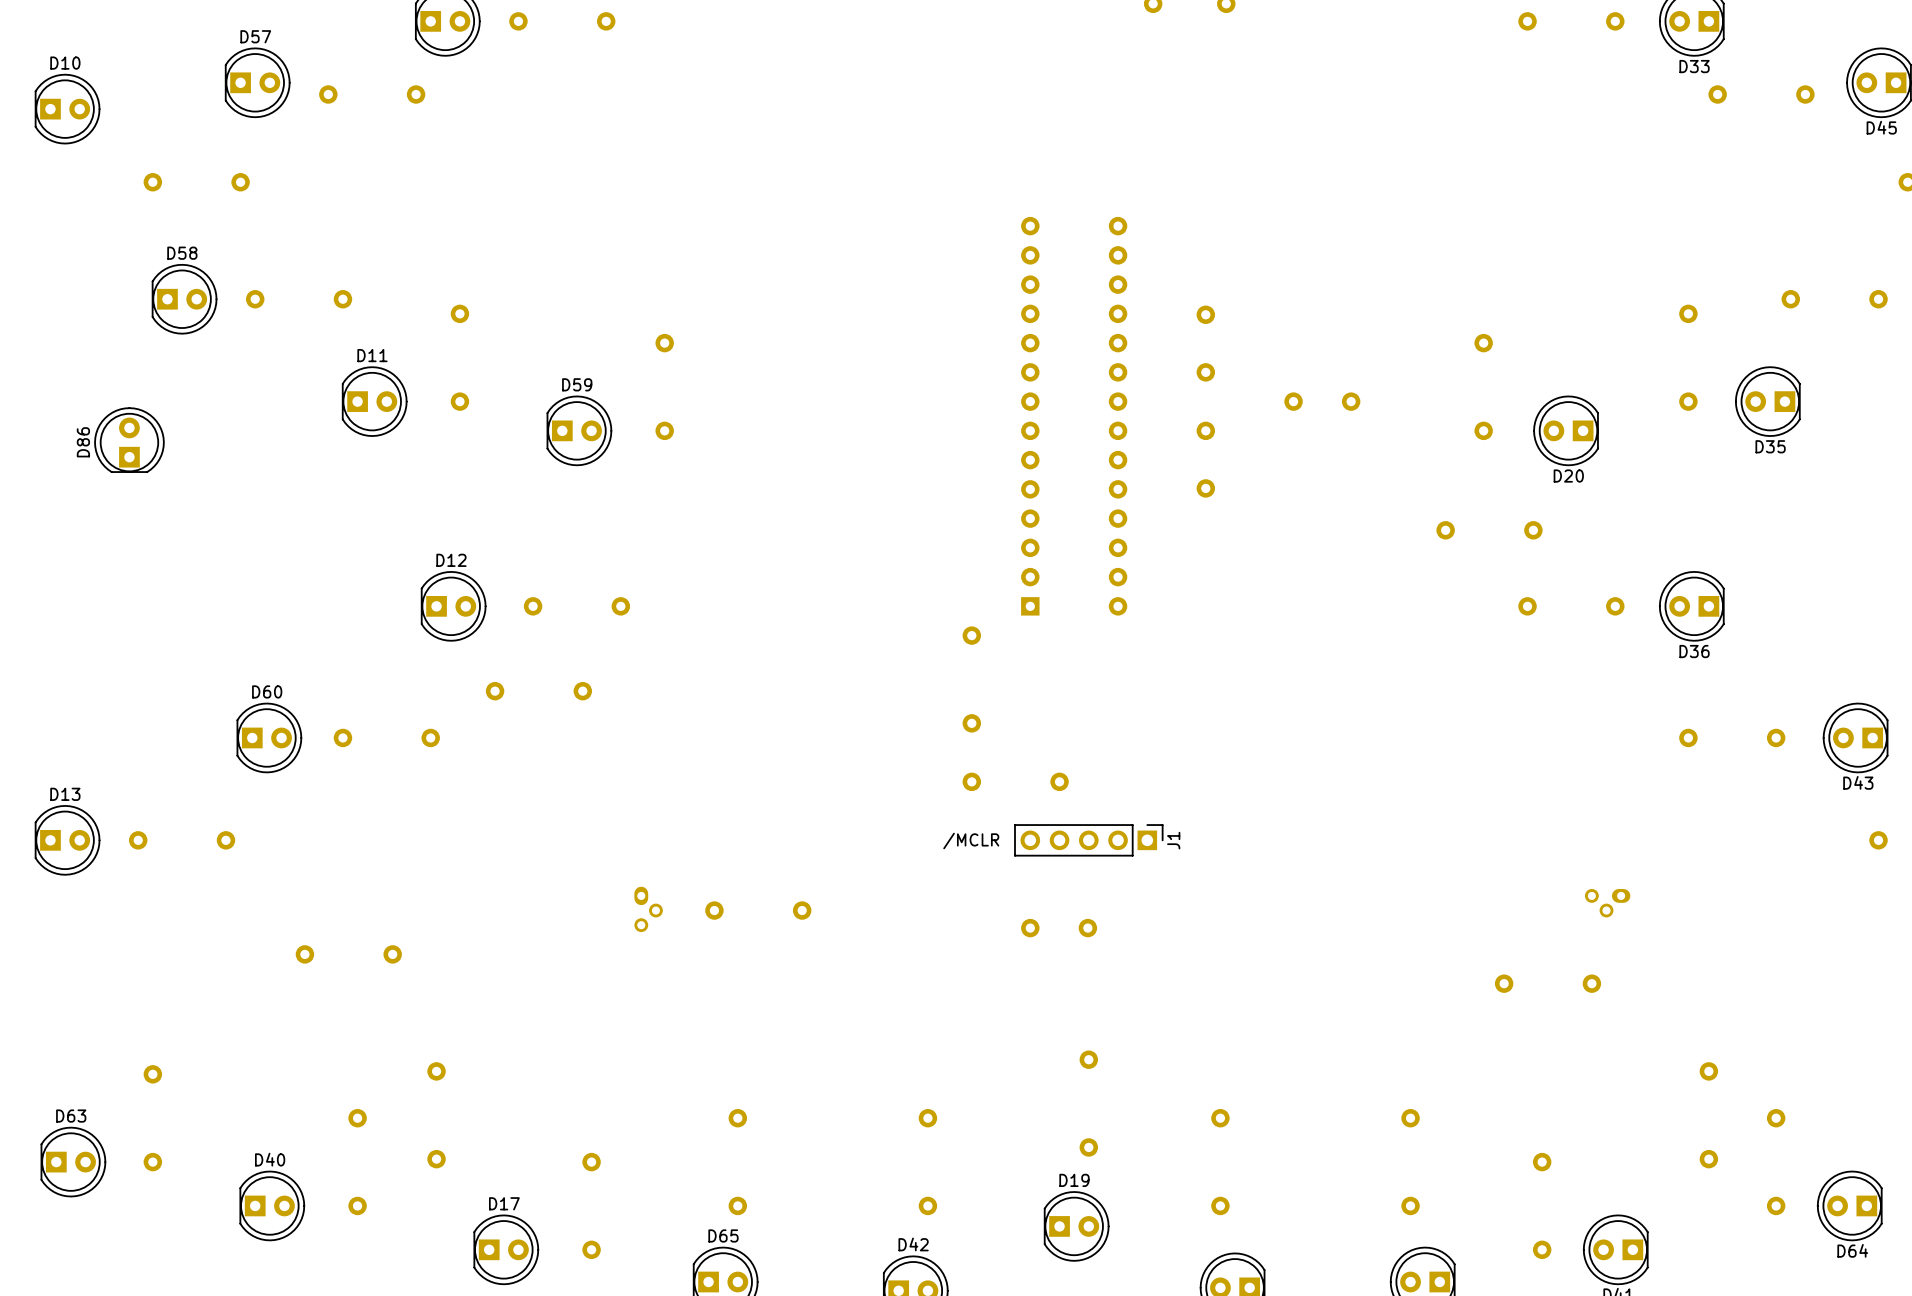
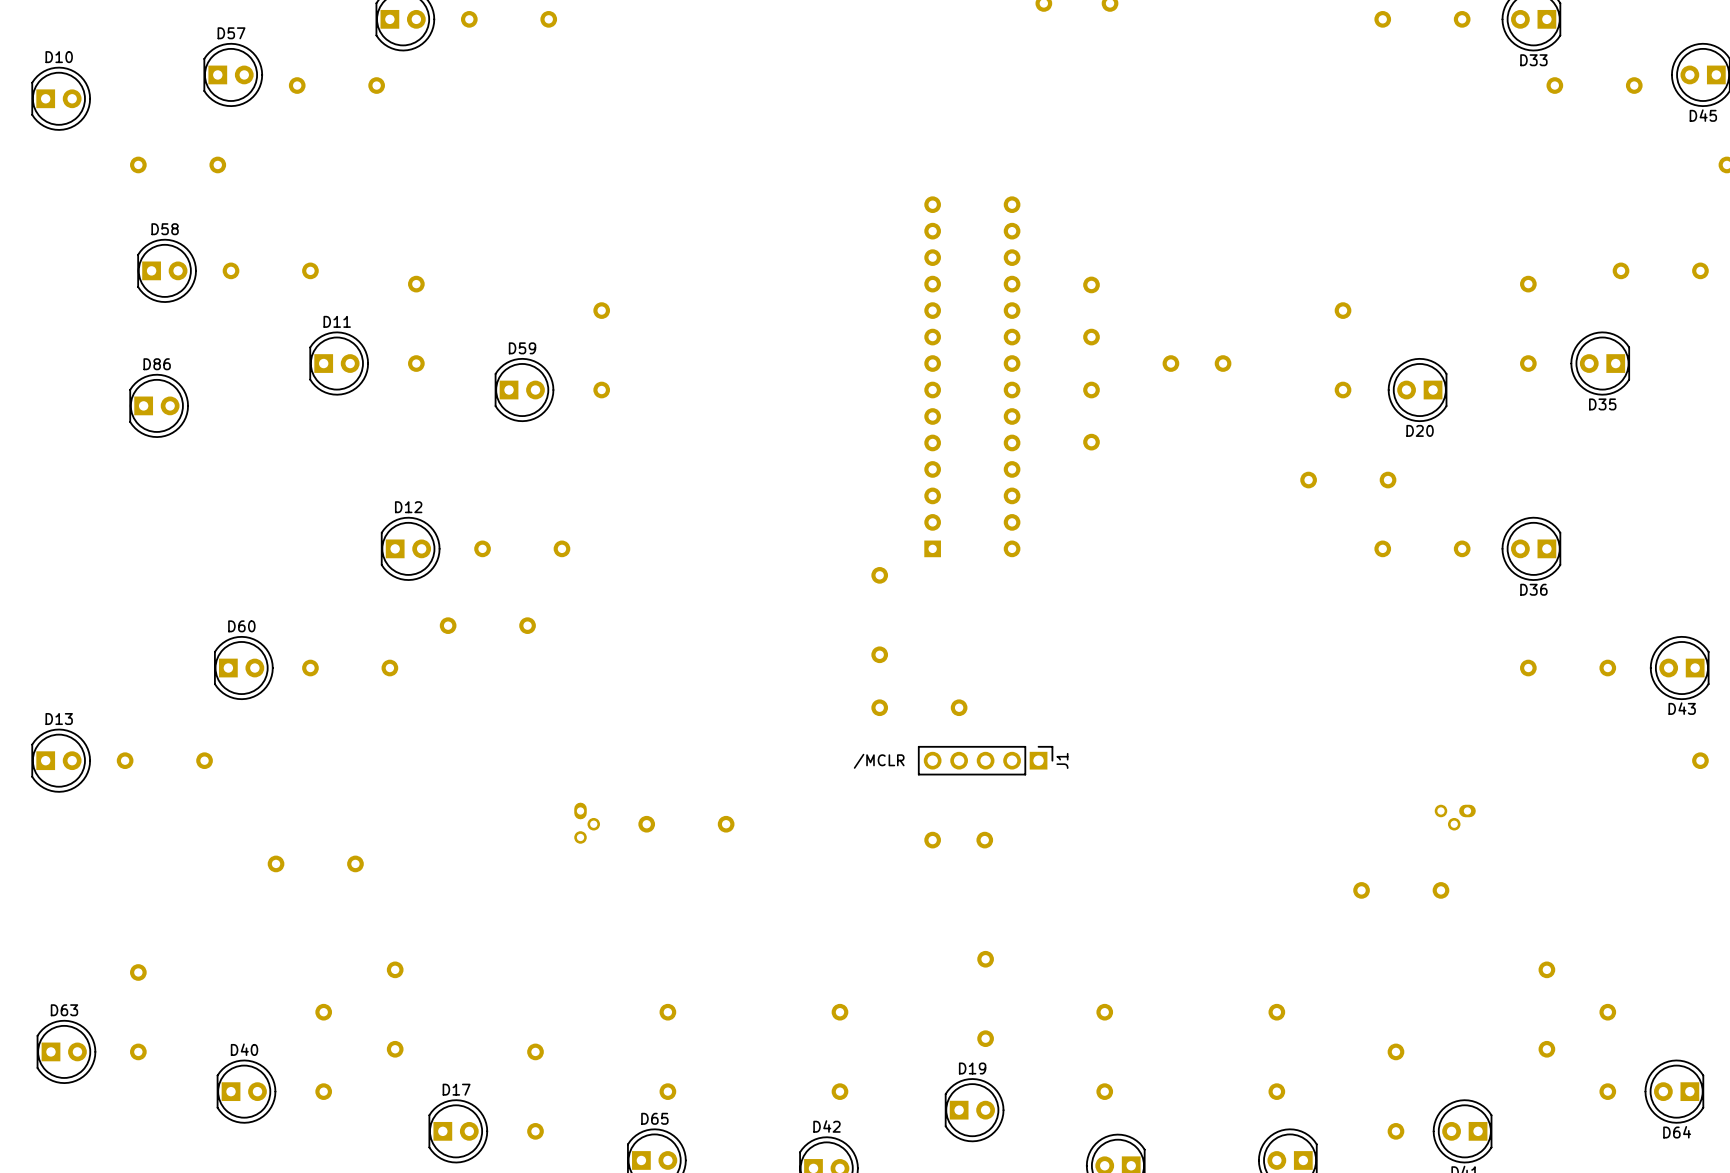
D86 rotation: 0° (129, 440) -> 90° clockwise (159, 405)
D86 position: (129, 440) -> (159, 405)

